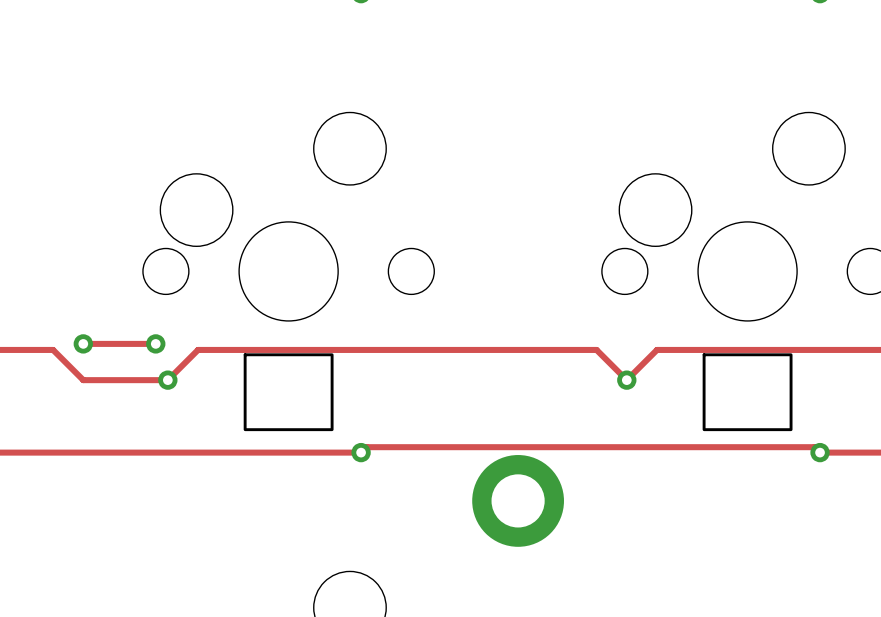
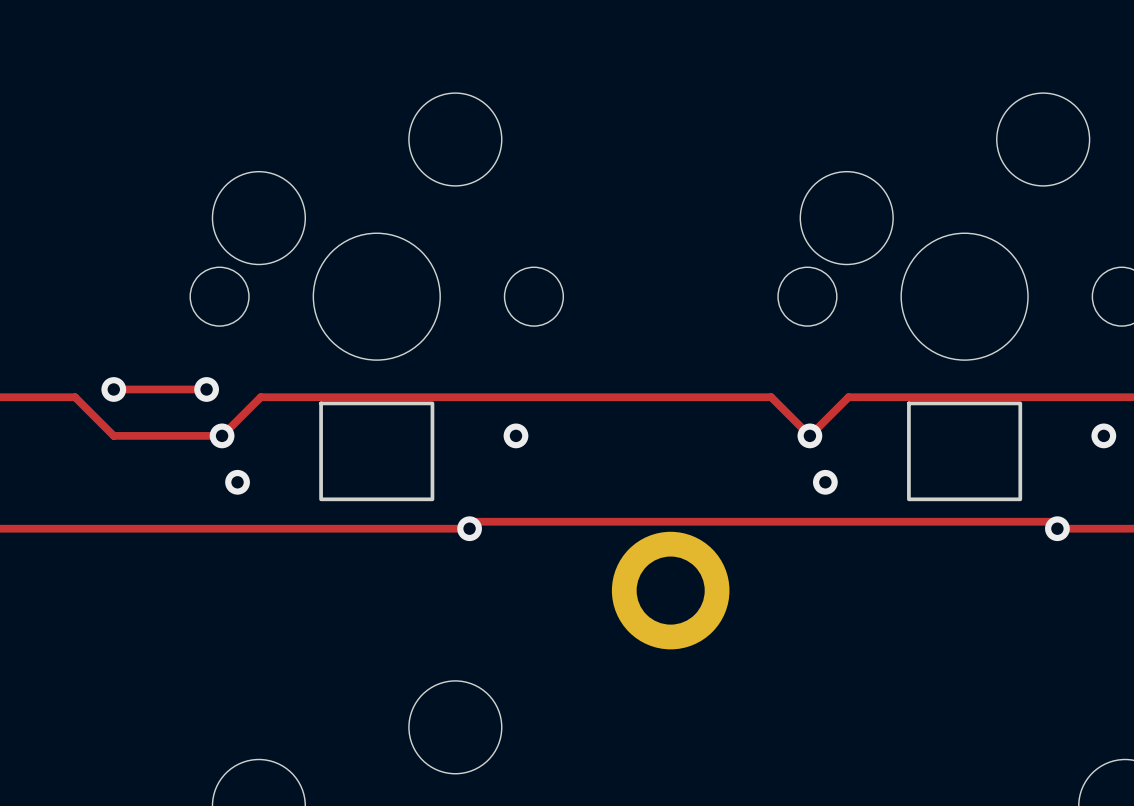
via: none -> (515, 435)
via: none -> (1103, 435)
via: none -> (237, 482)
via: none -> (825, 482)

